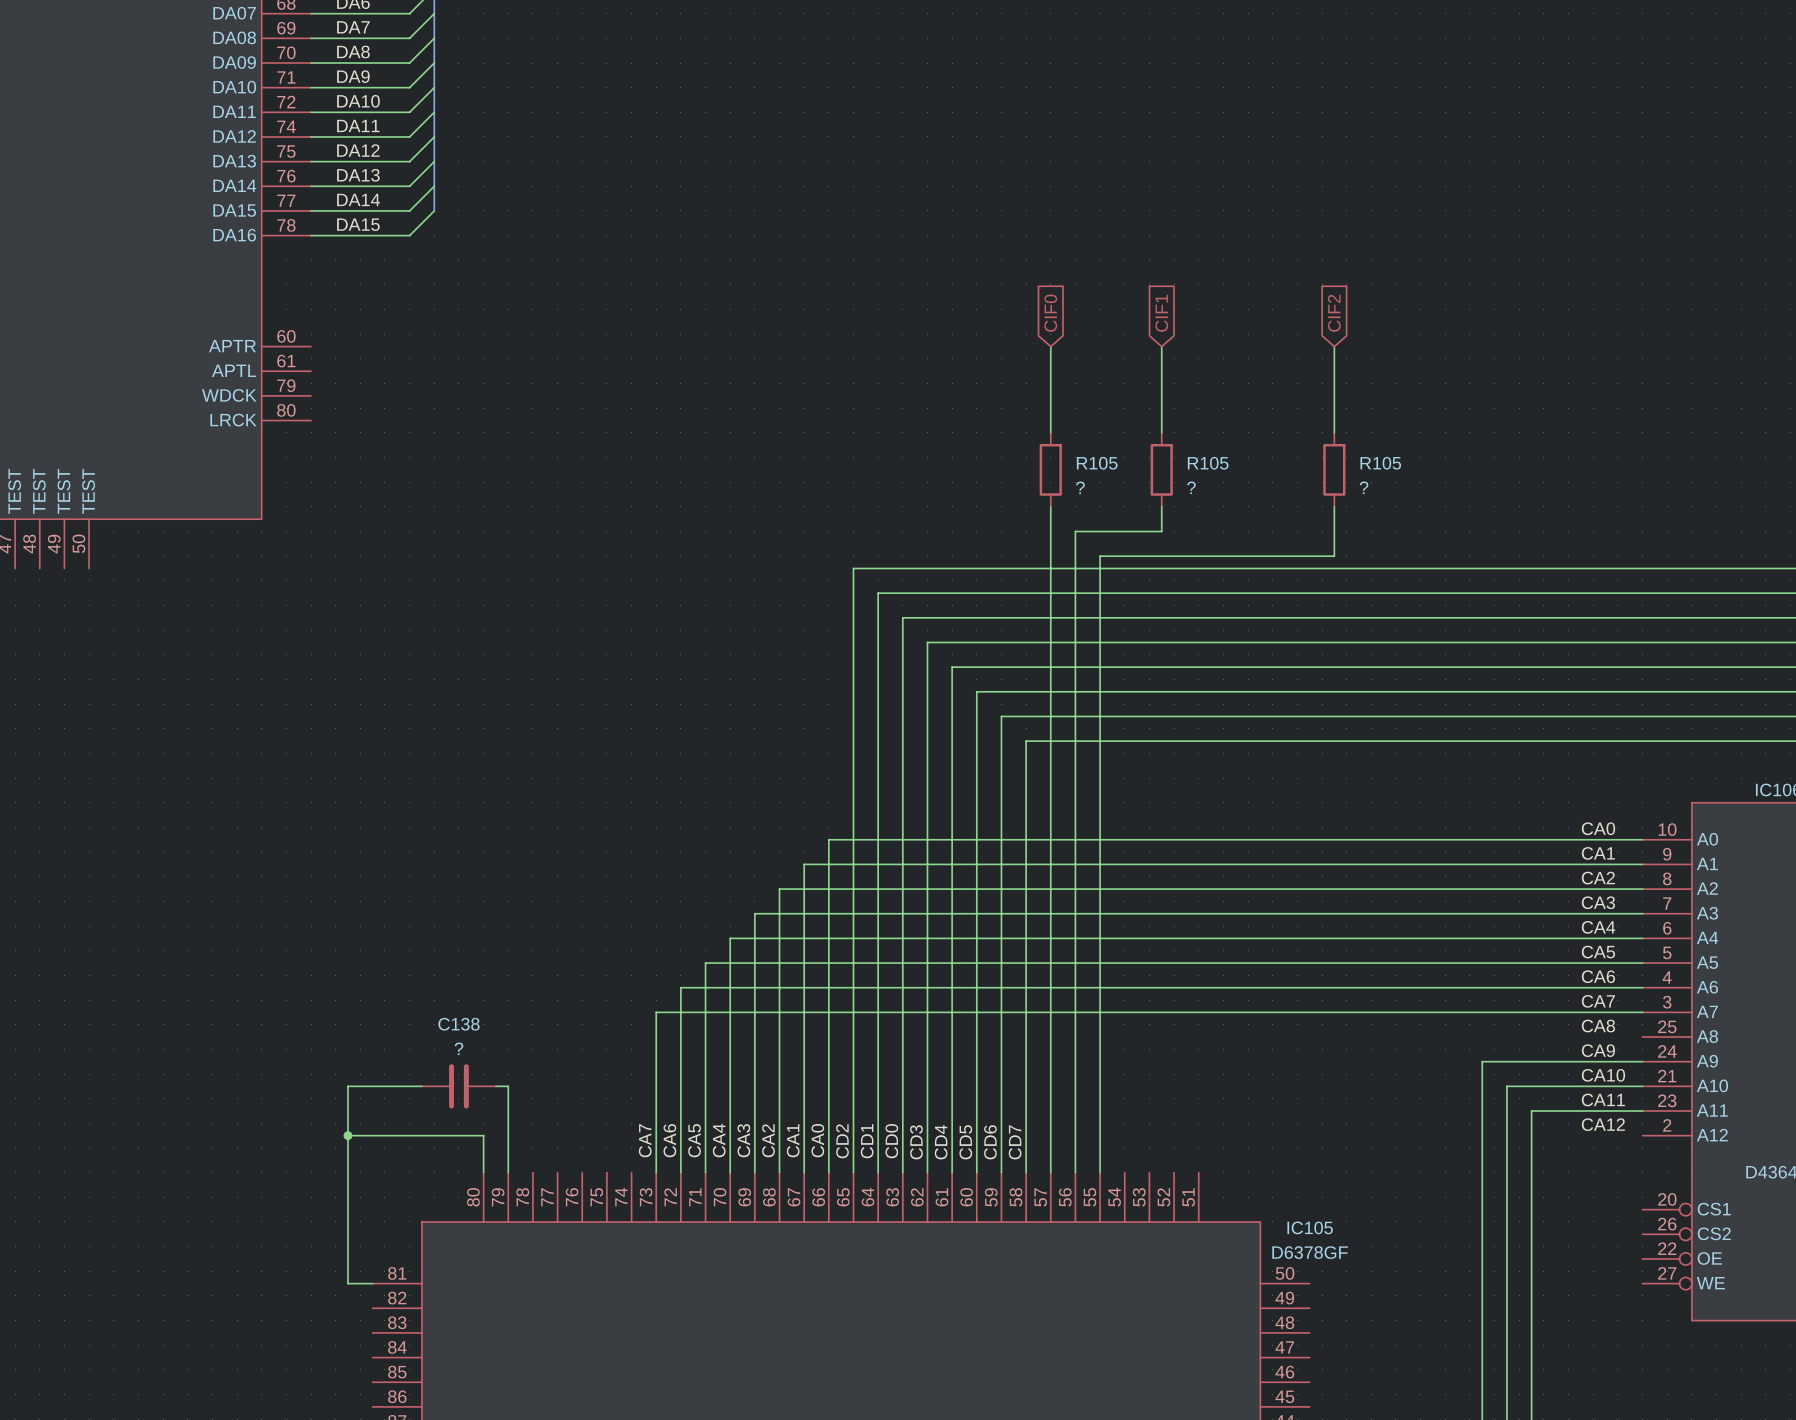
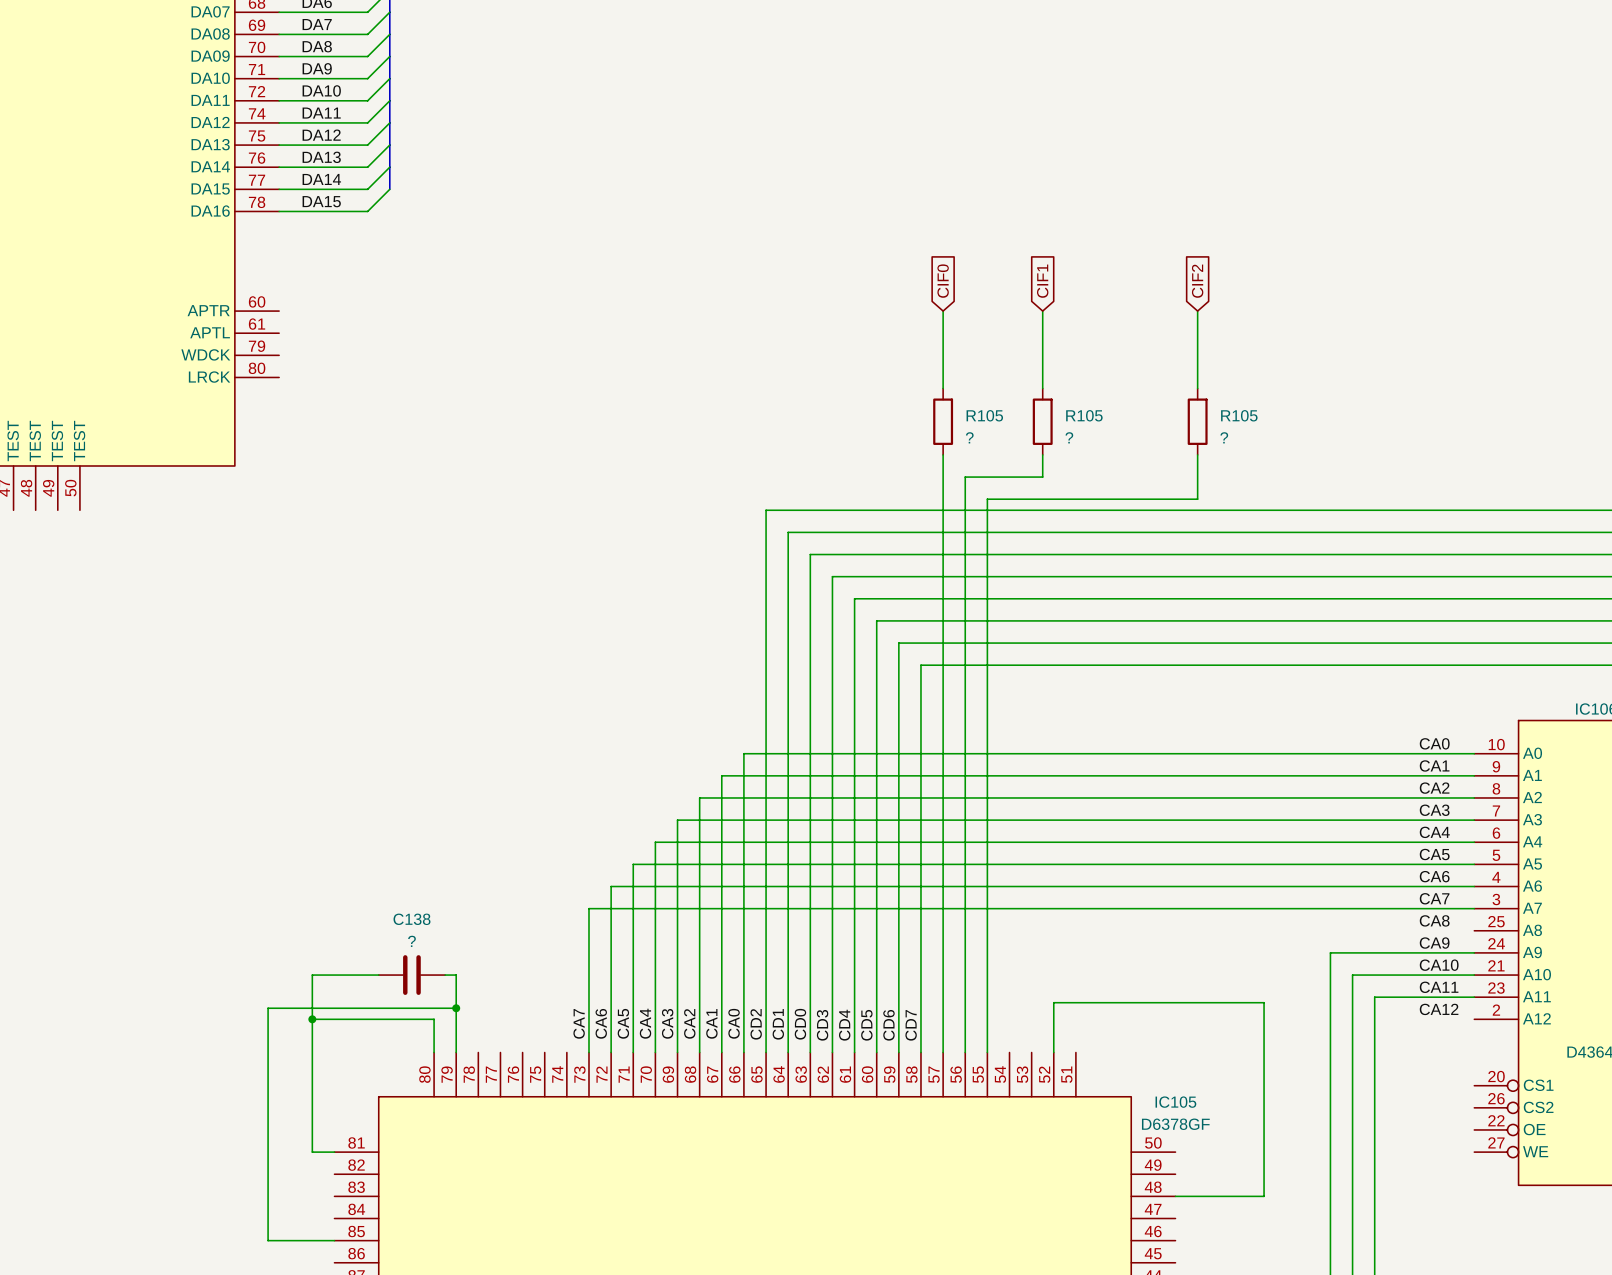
wire: none -> (456, 1008) (268, 1008) (268, 1240) (334, 1240)
junction: none -> (456, 1008)
wire: none -> (1053, 1052) (1053, 1002) (1264, 1002) (1264, 1196) (1175, 1196)

